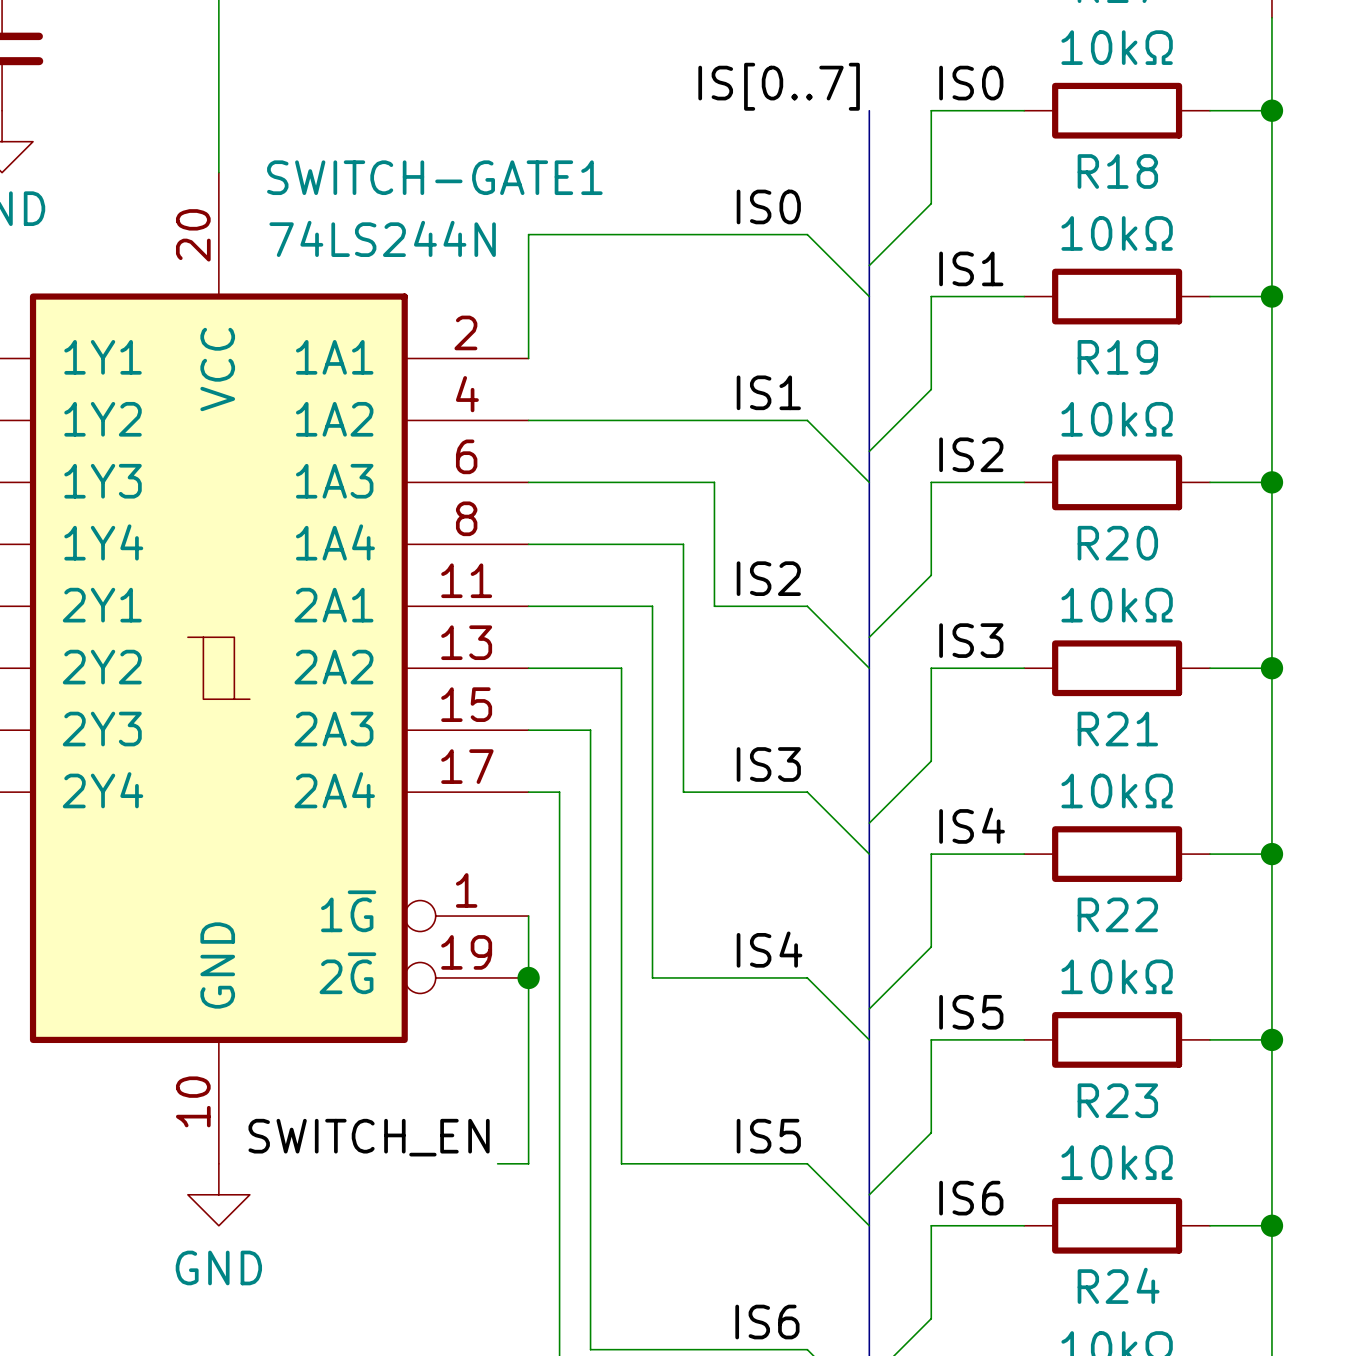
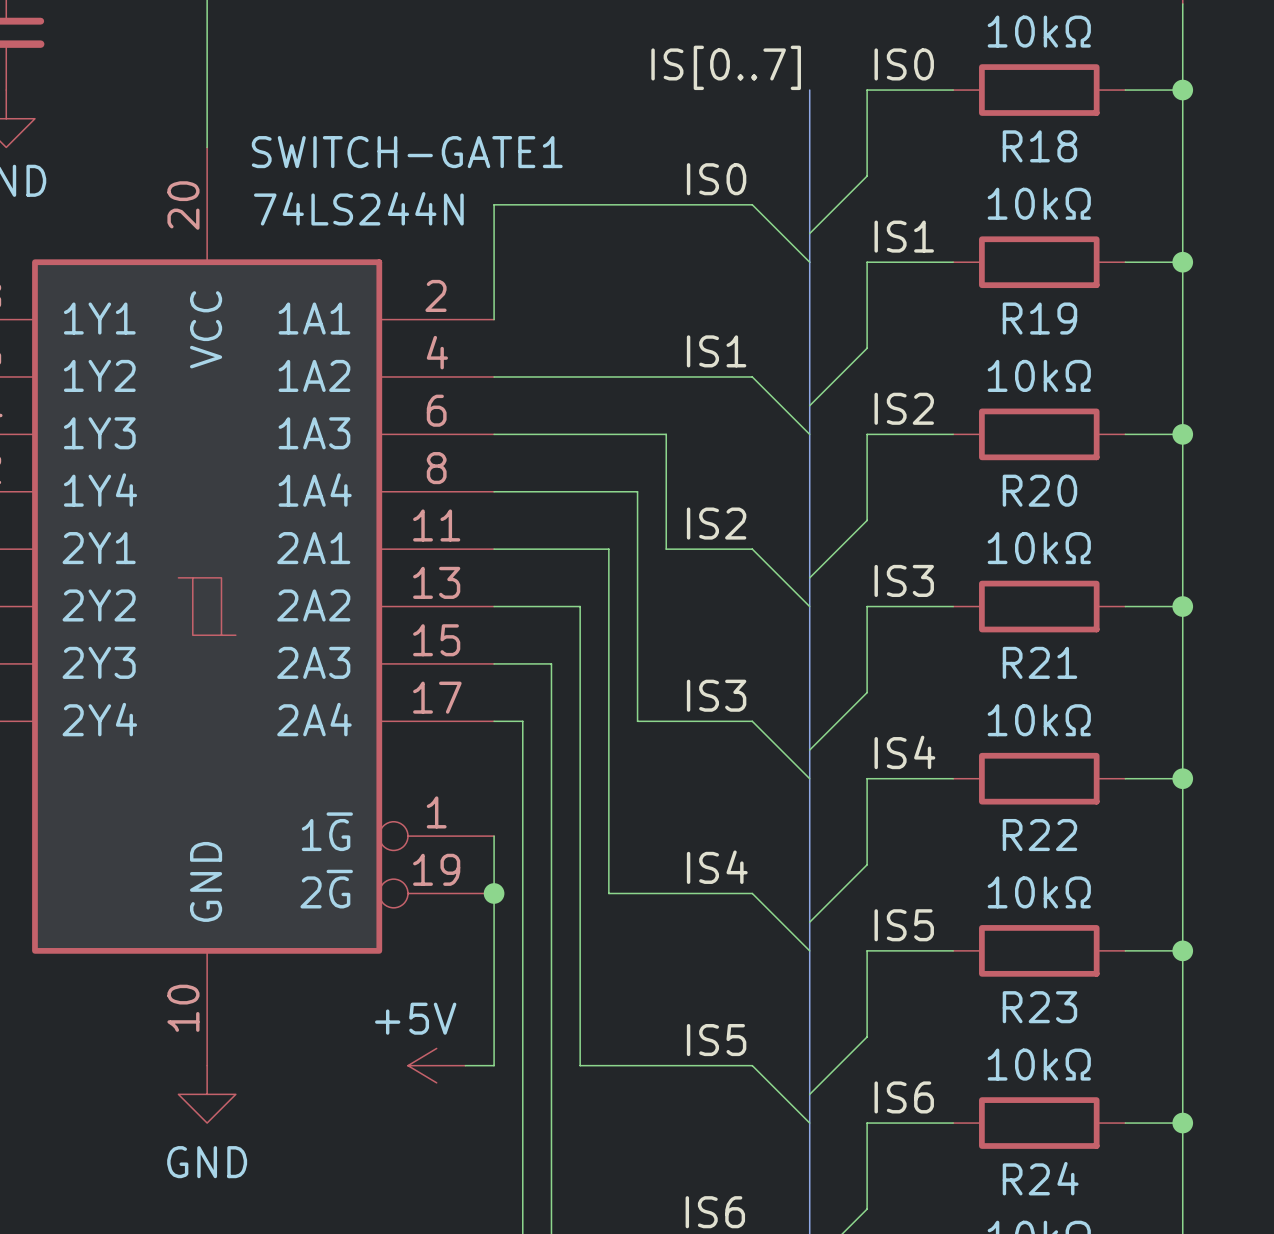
label: SWITCH_EN (369, 1137) -> none
power symbol: none -> +5V (436, 1065)

